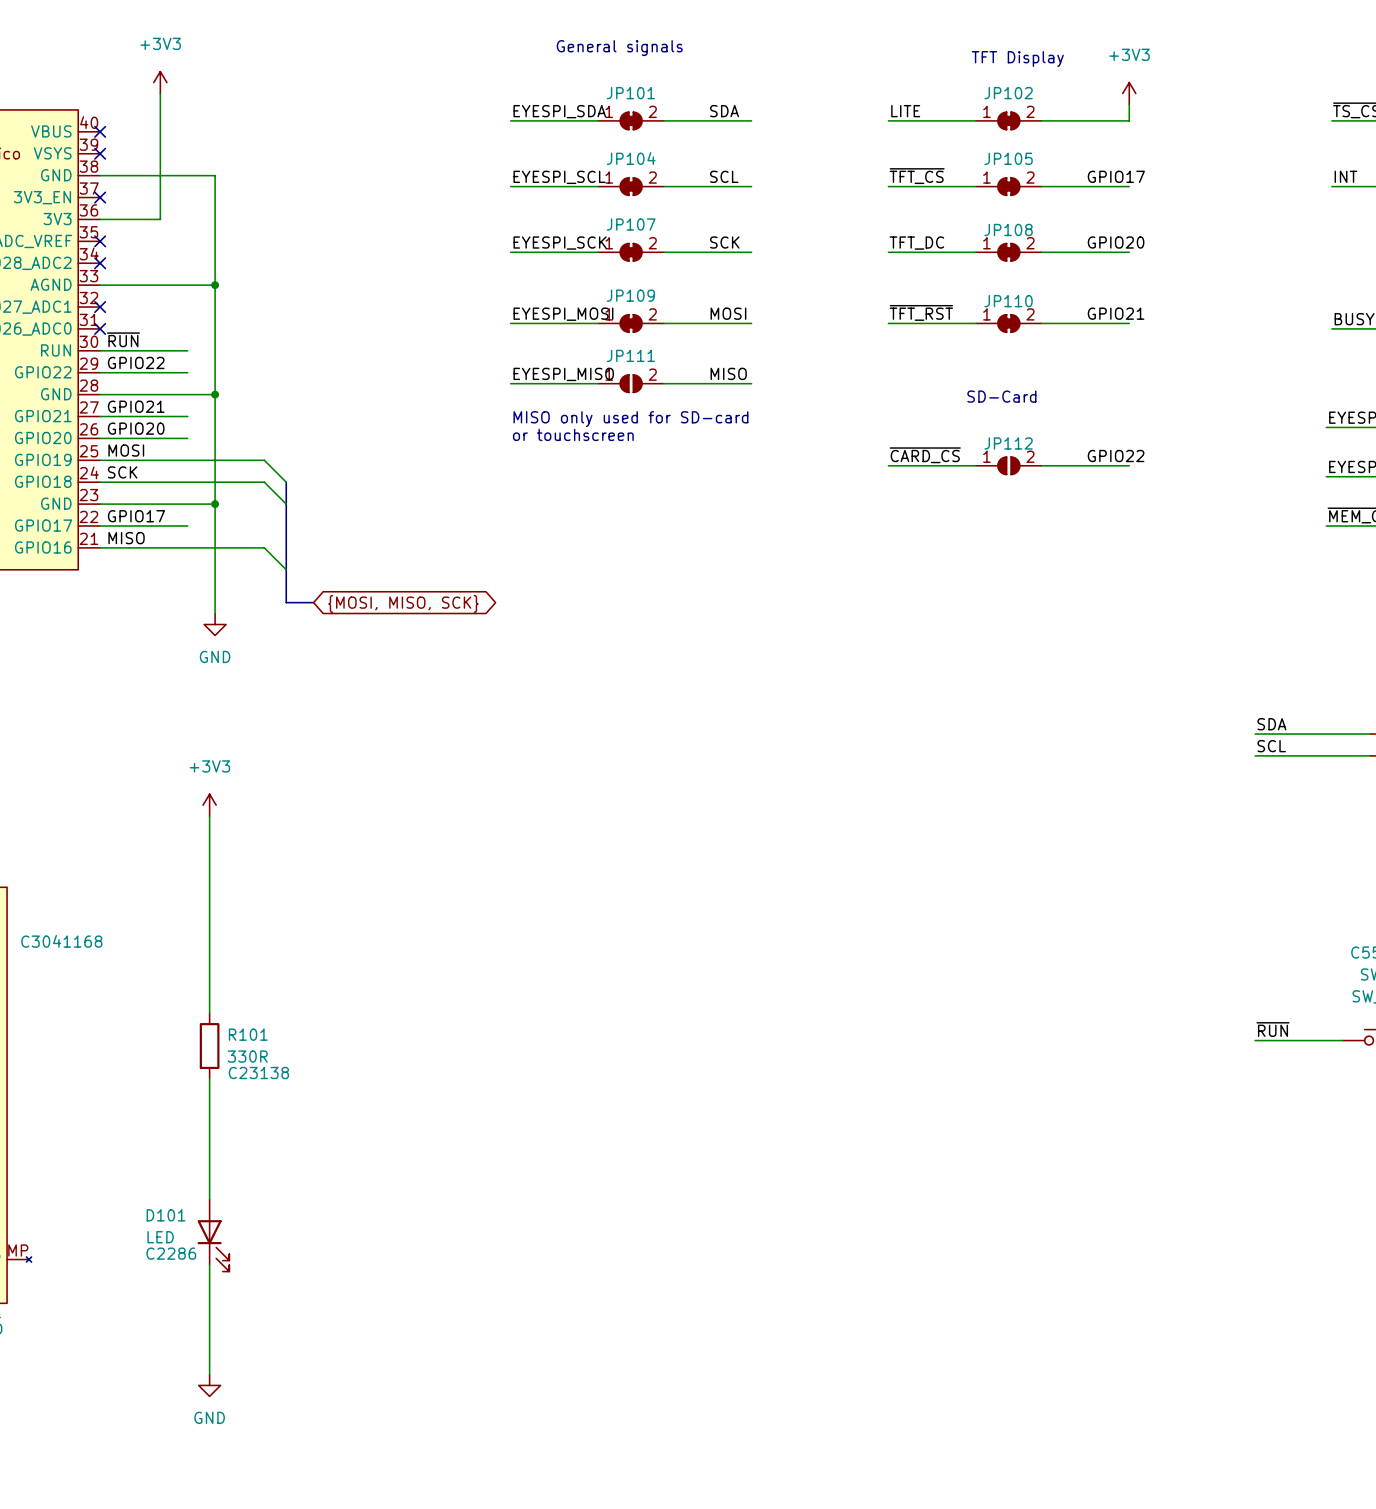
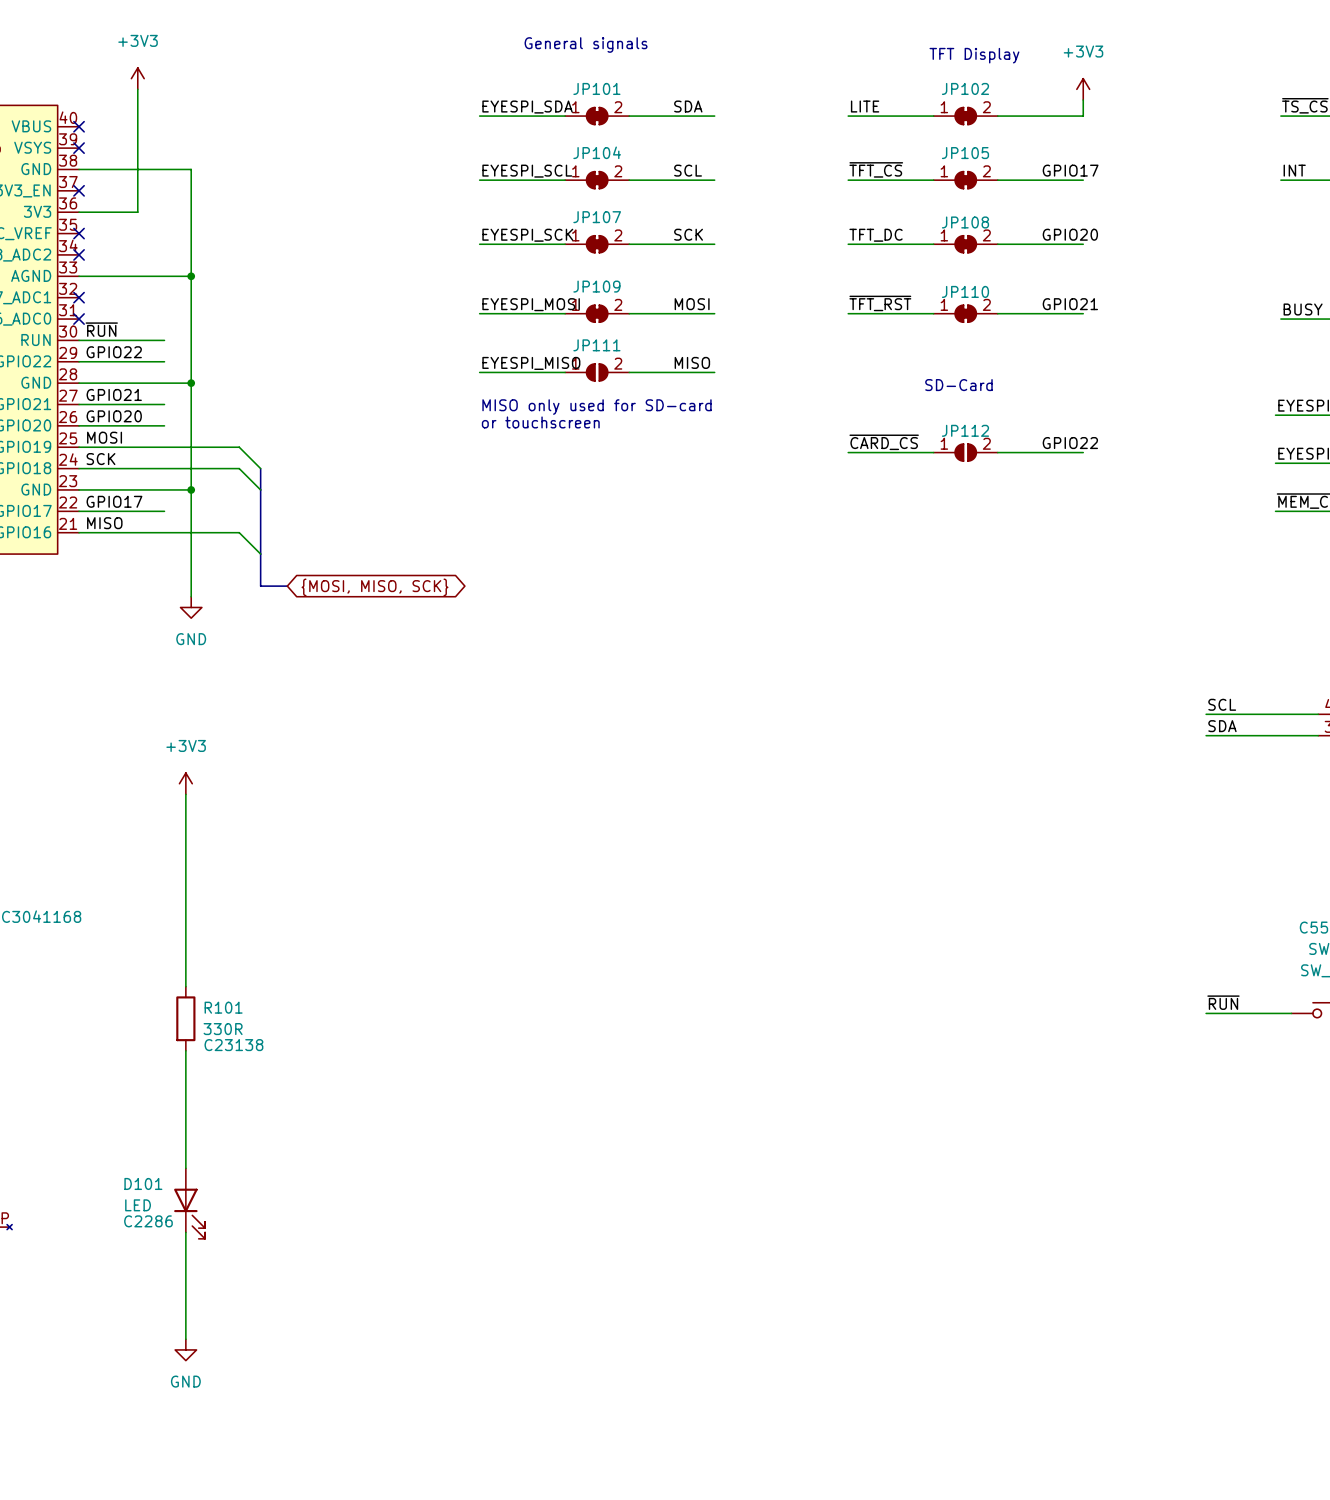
label: SDA (1271, 724) -> SCL (1222, 704)
label: SCL (1271, 746) -> SDA (1222, 726)

